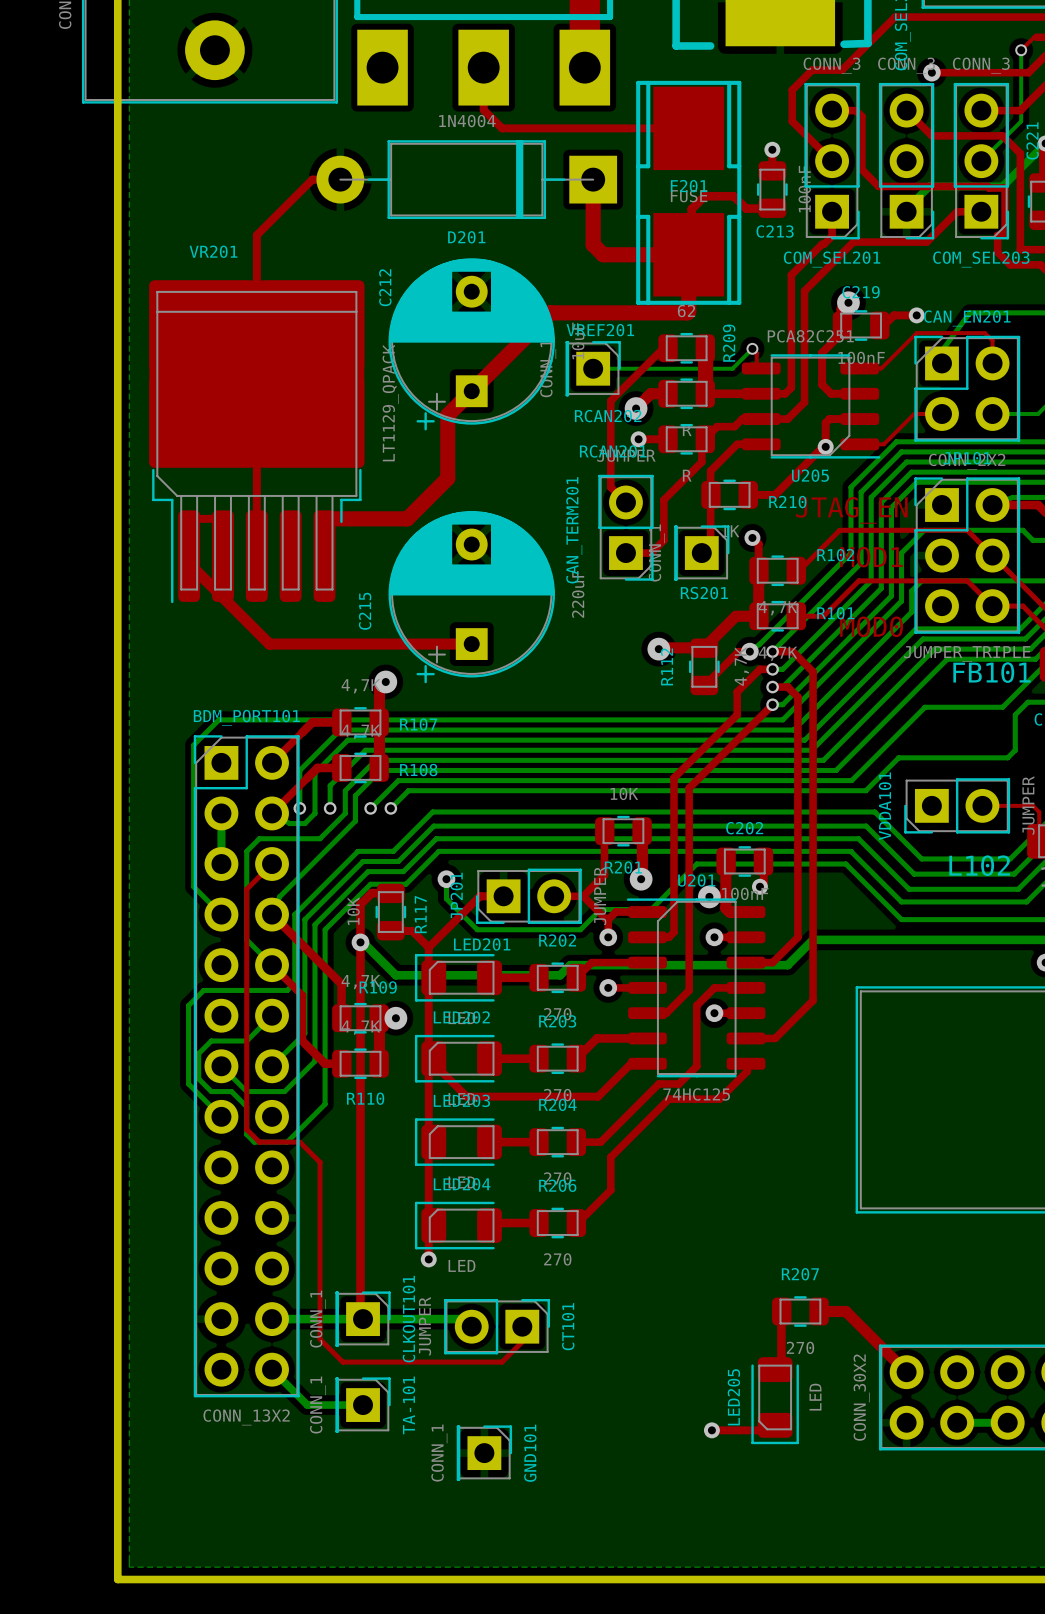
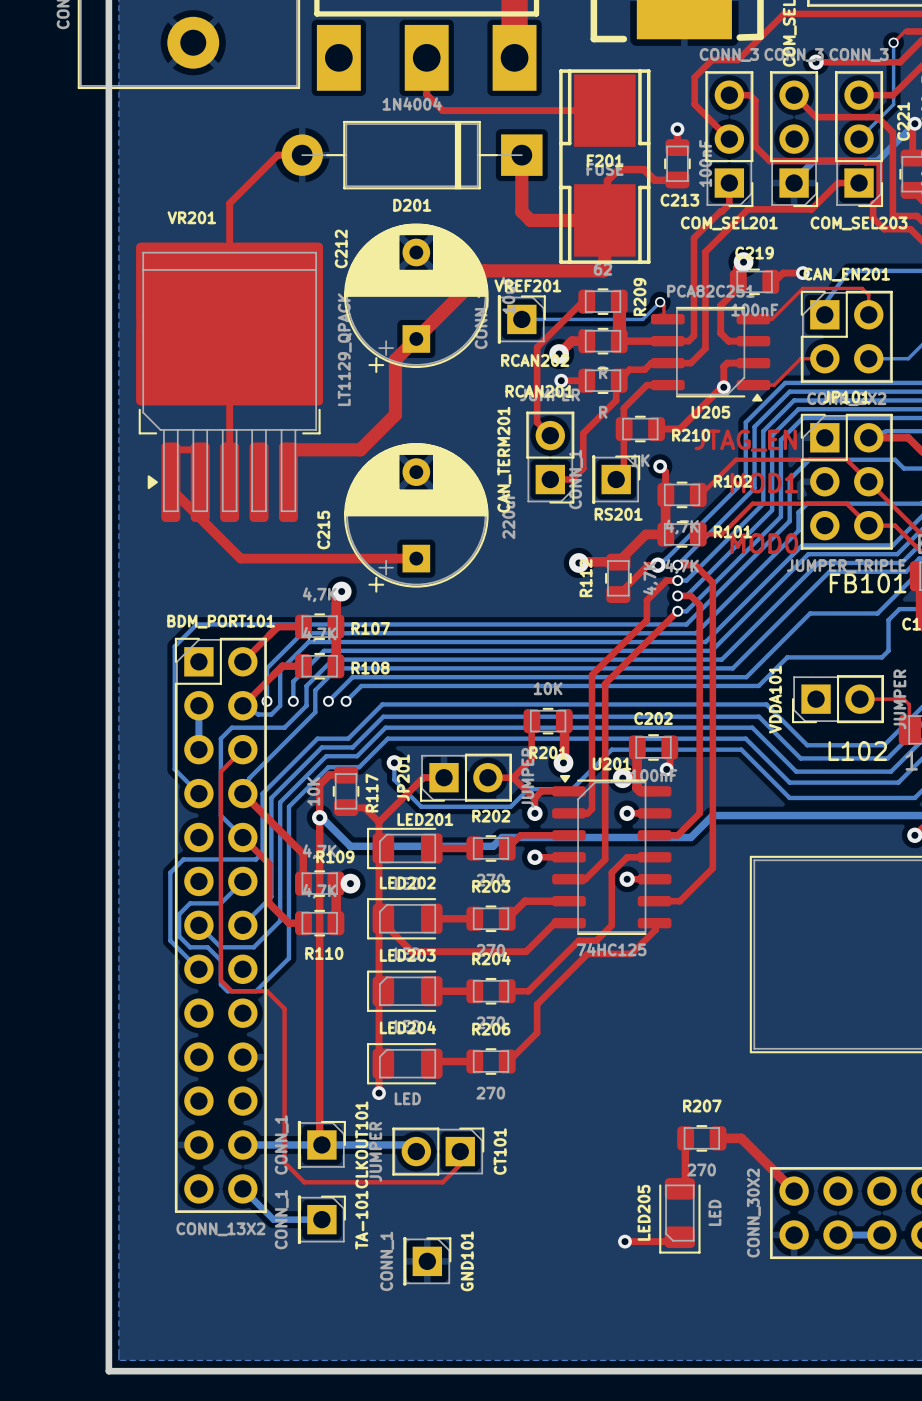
VR201 footprint: [149, 280, 365, 604] -> [136, 242, 324, 523]
U205 footprint: [741, 354, 881, 459] -> [650, 306, 771, 402]
U201 footprint: [626, 898, 766, 1078] -> [552, 774, 672, 936]

